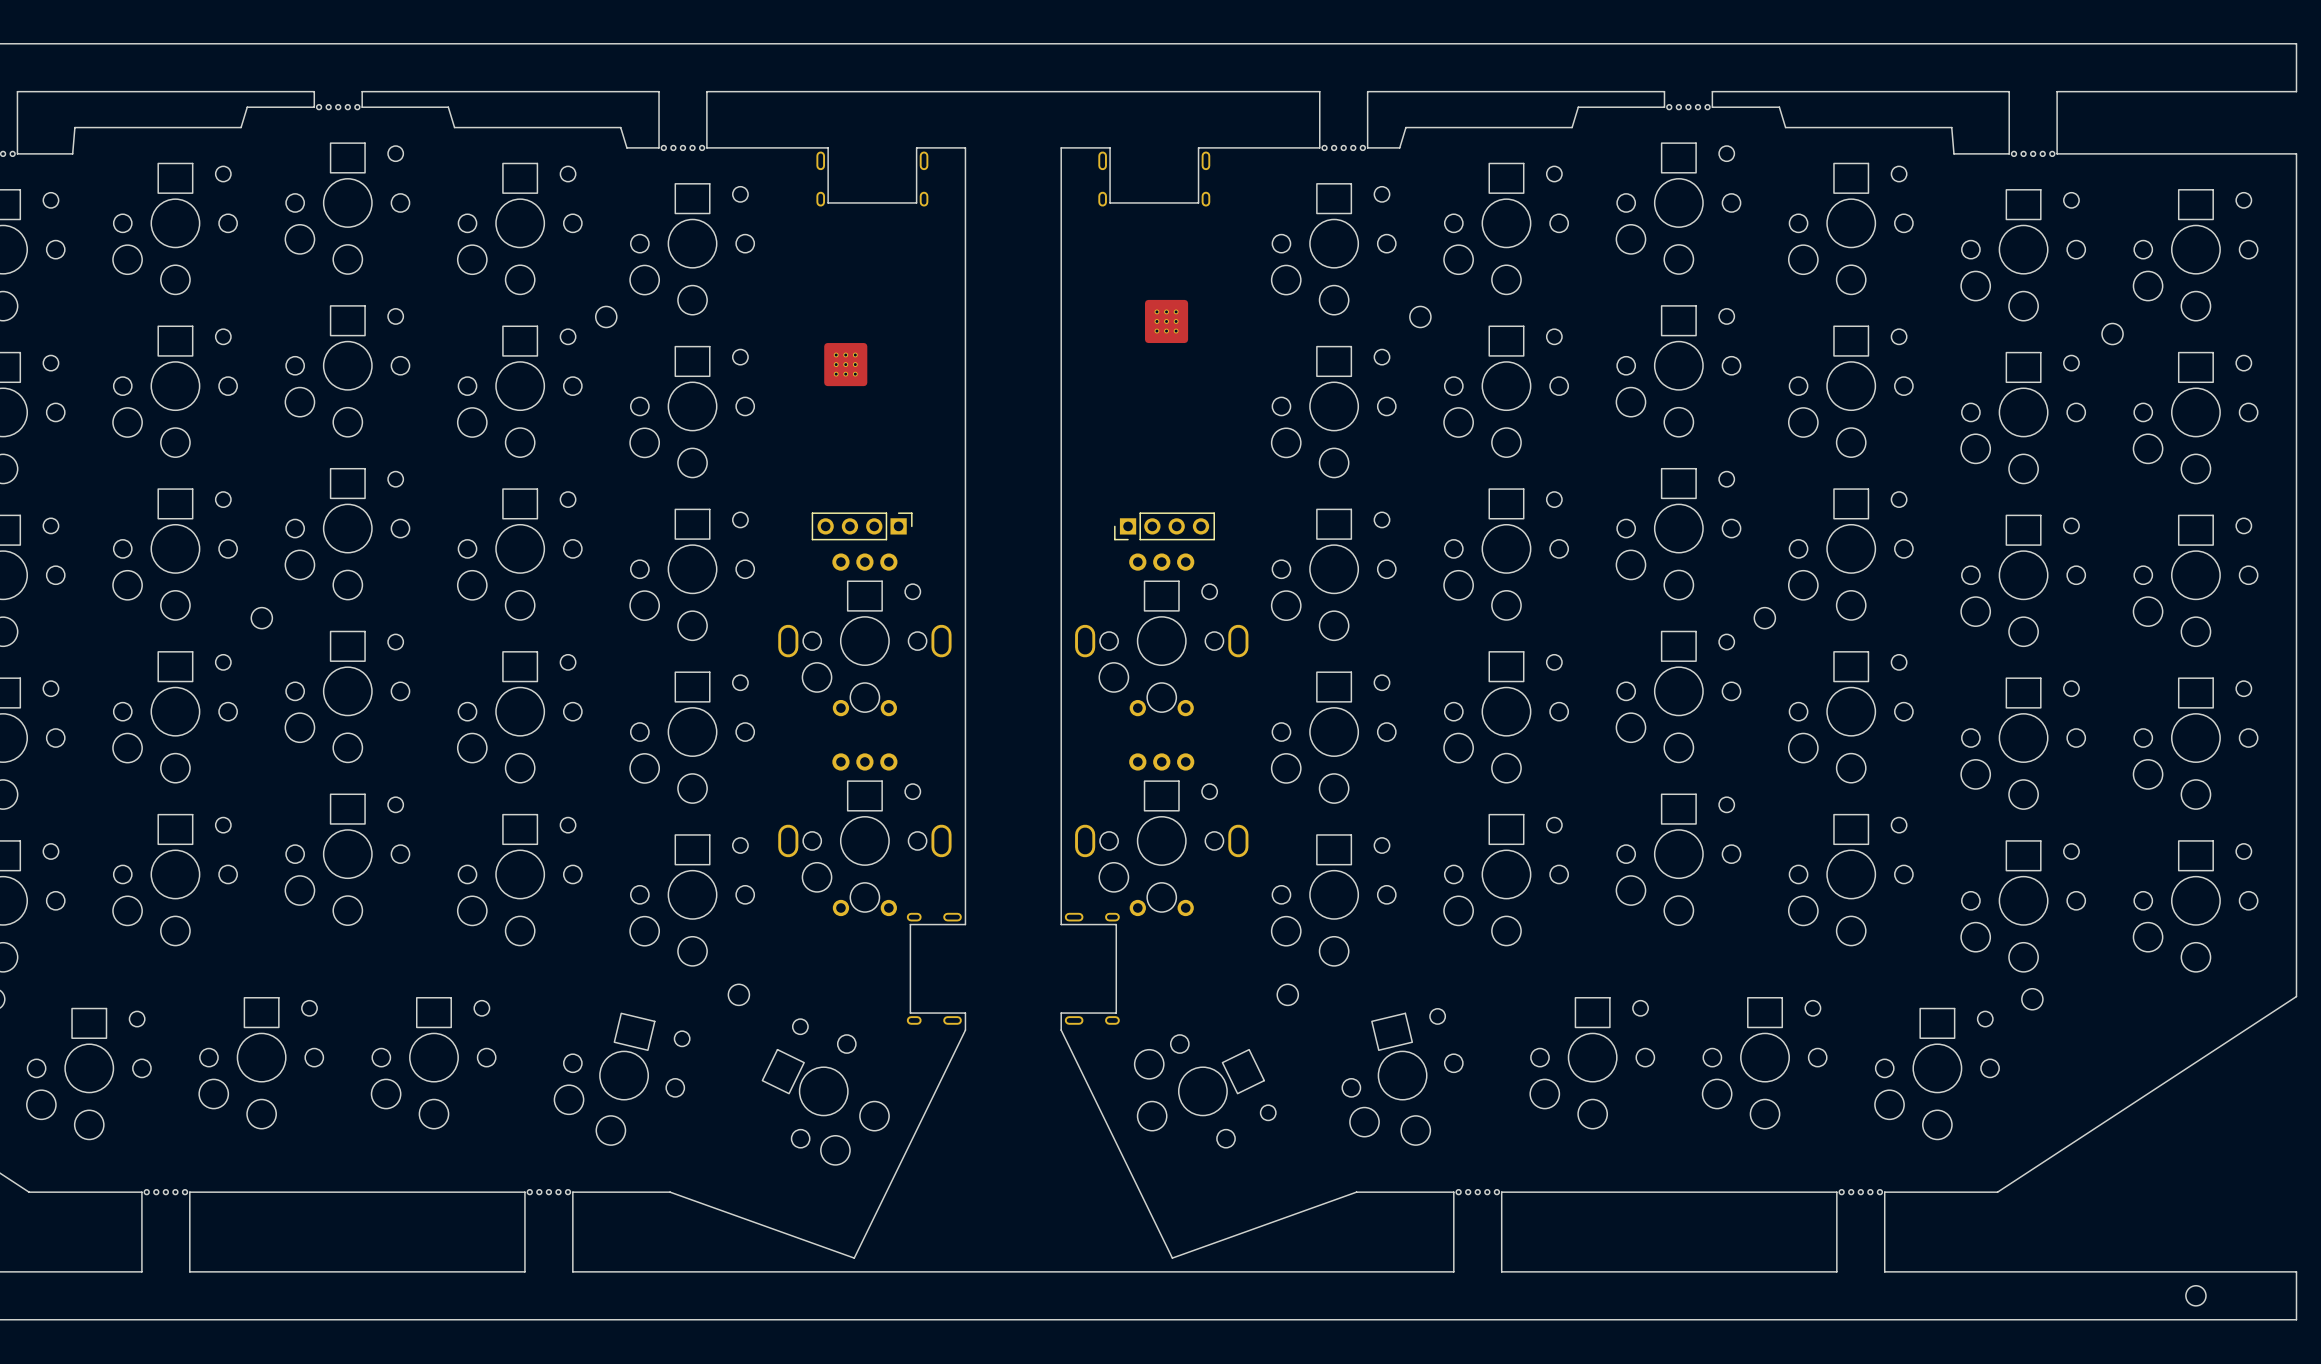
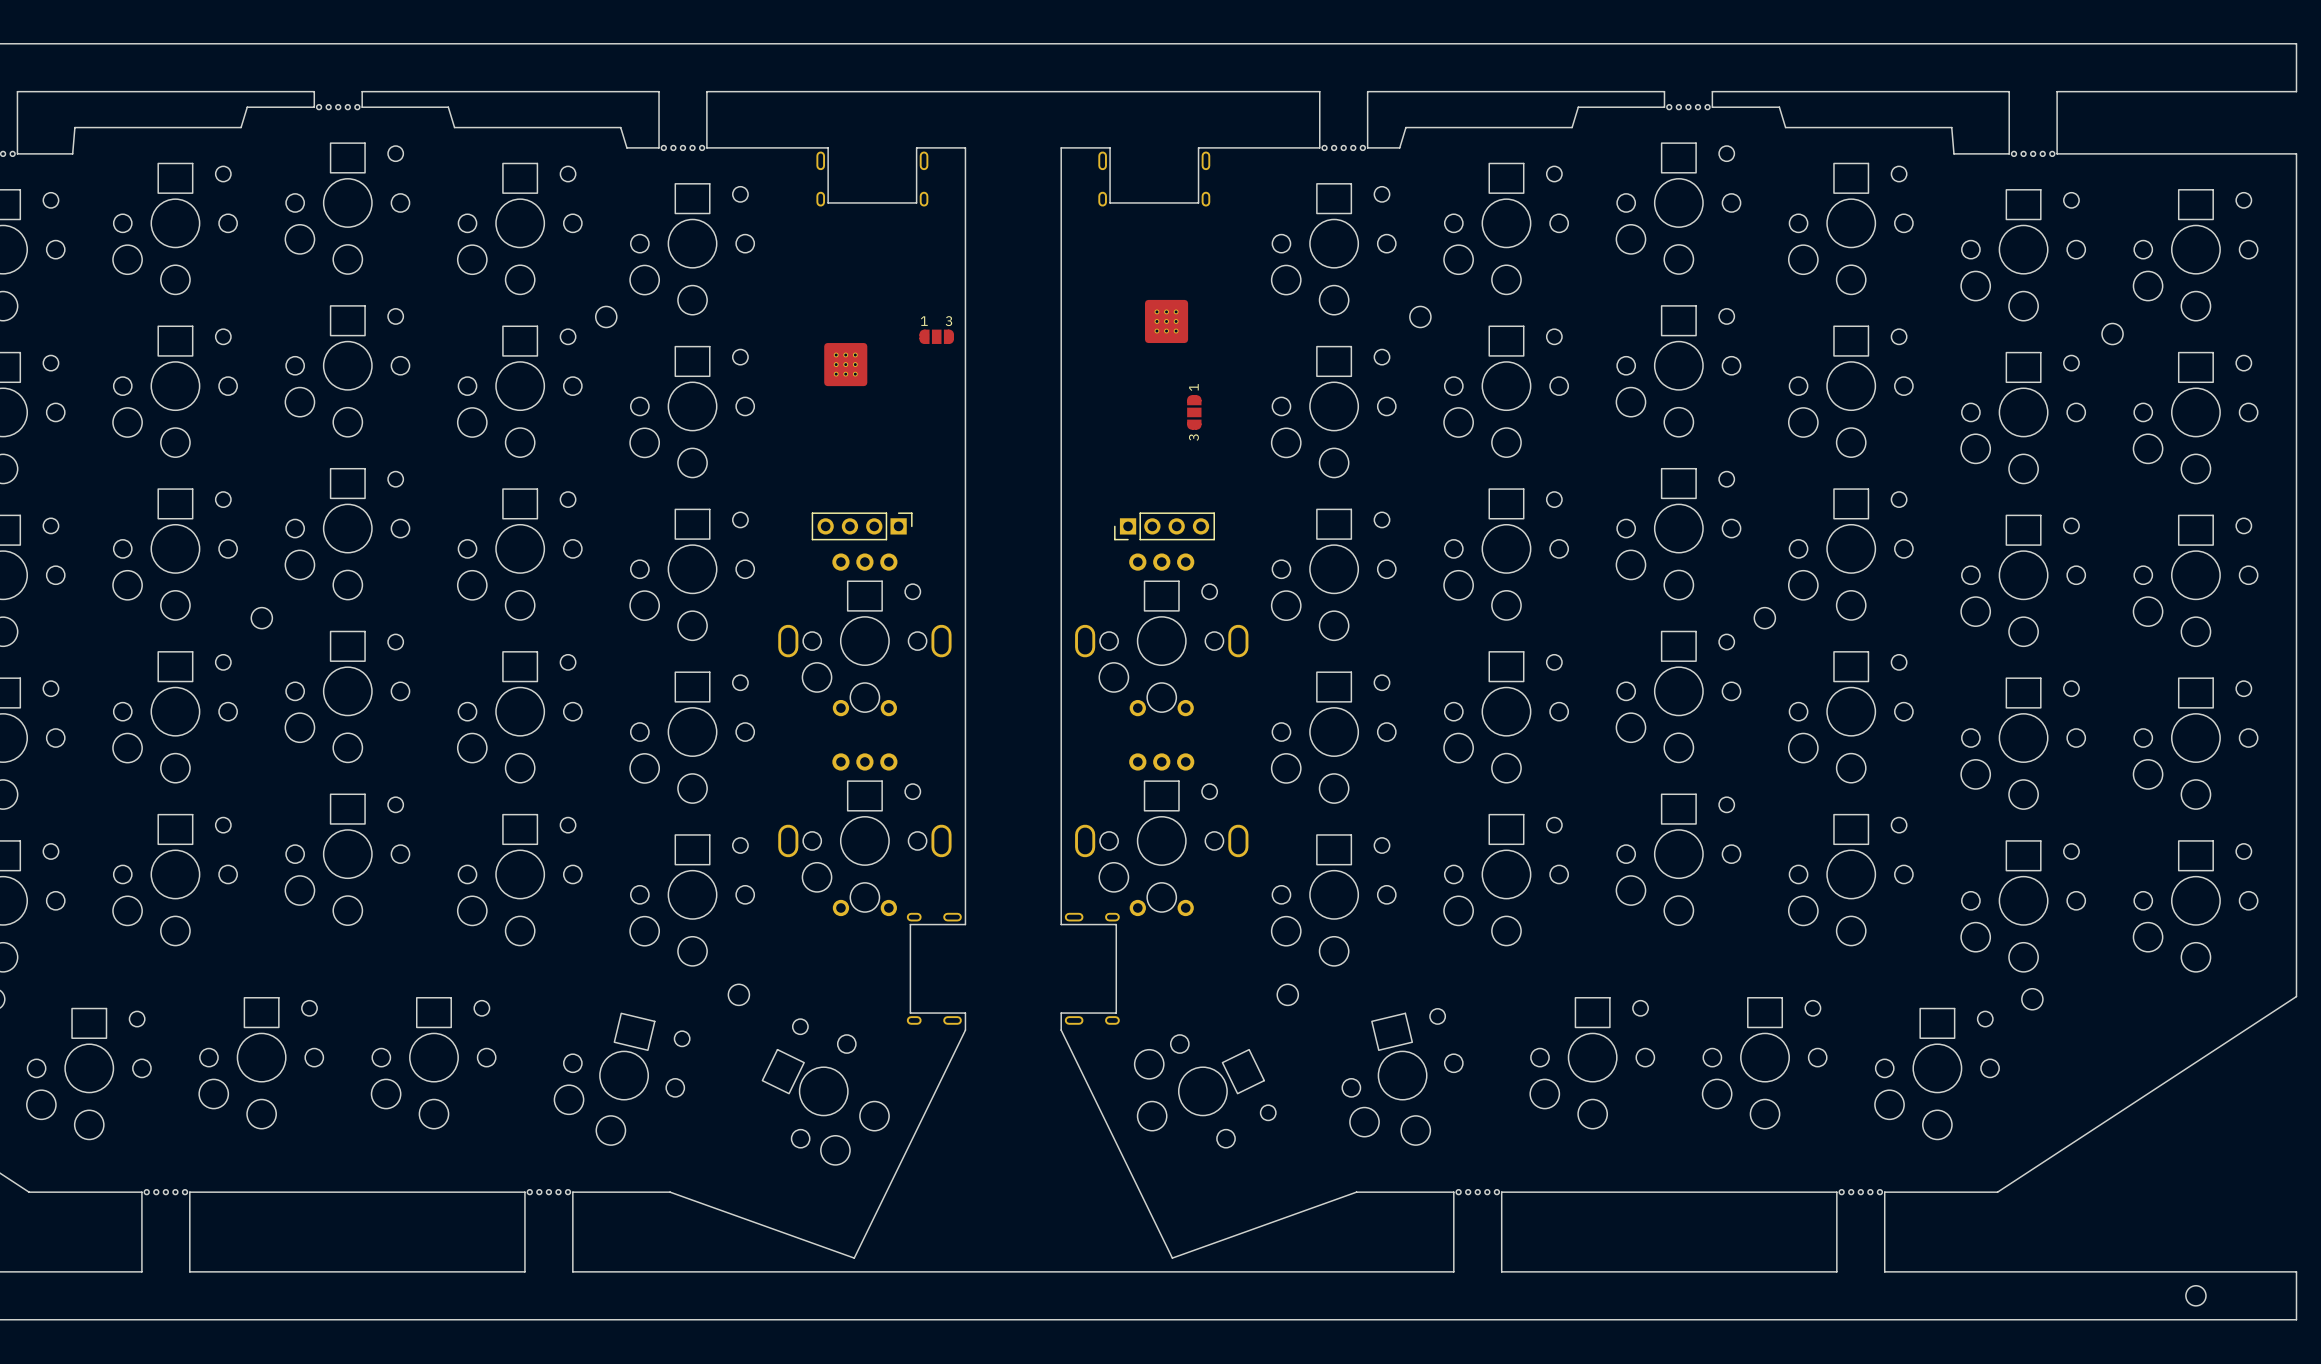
part: none -> (936, 336)
part: none -> (1194, 412)

